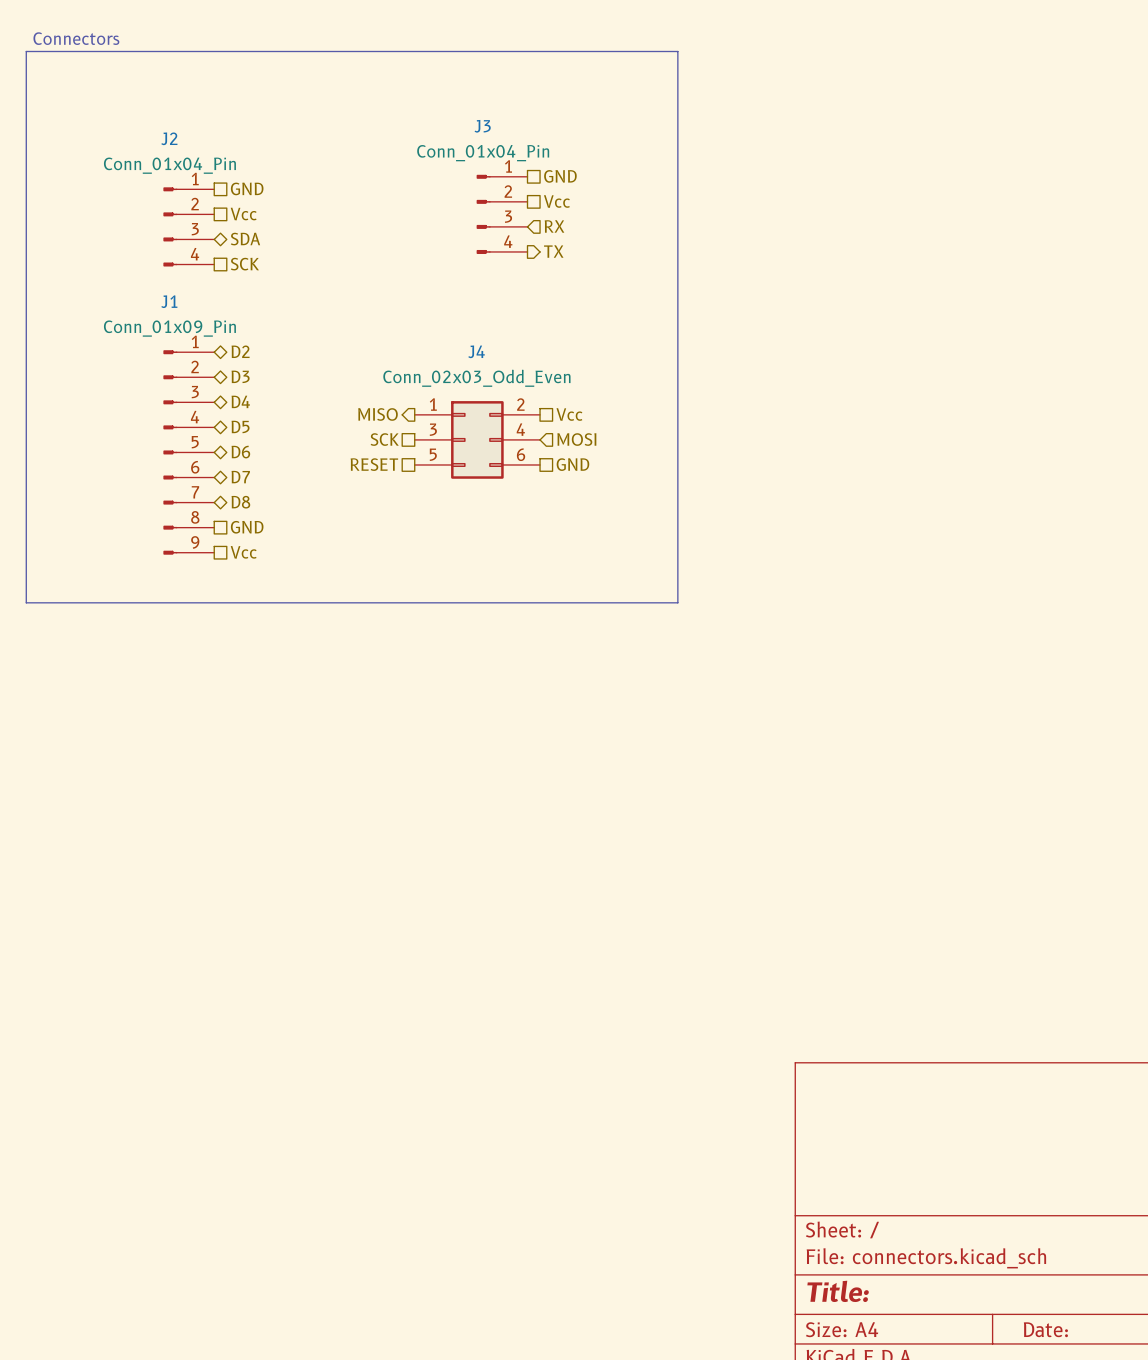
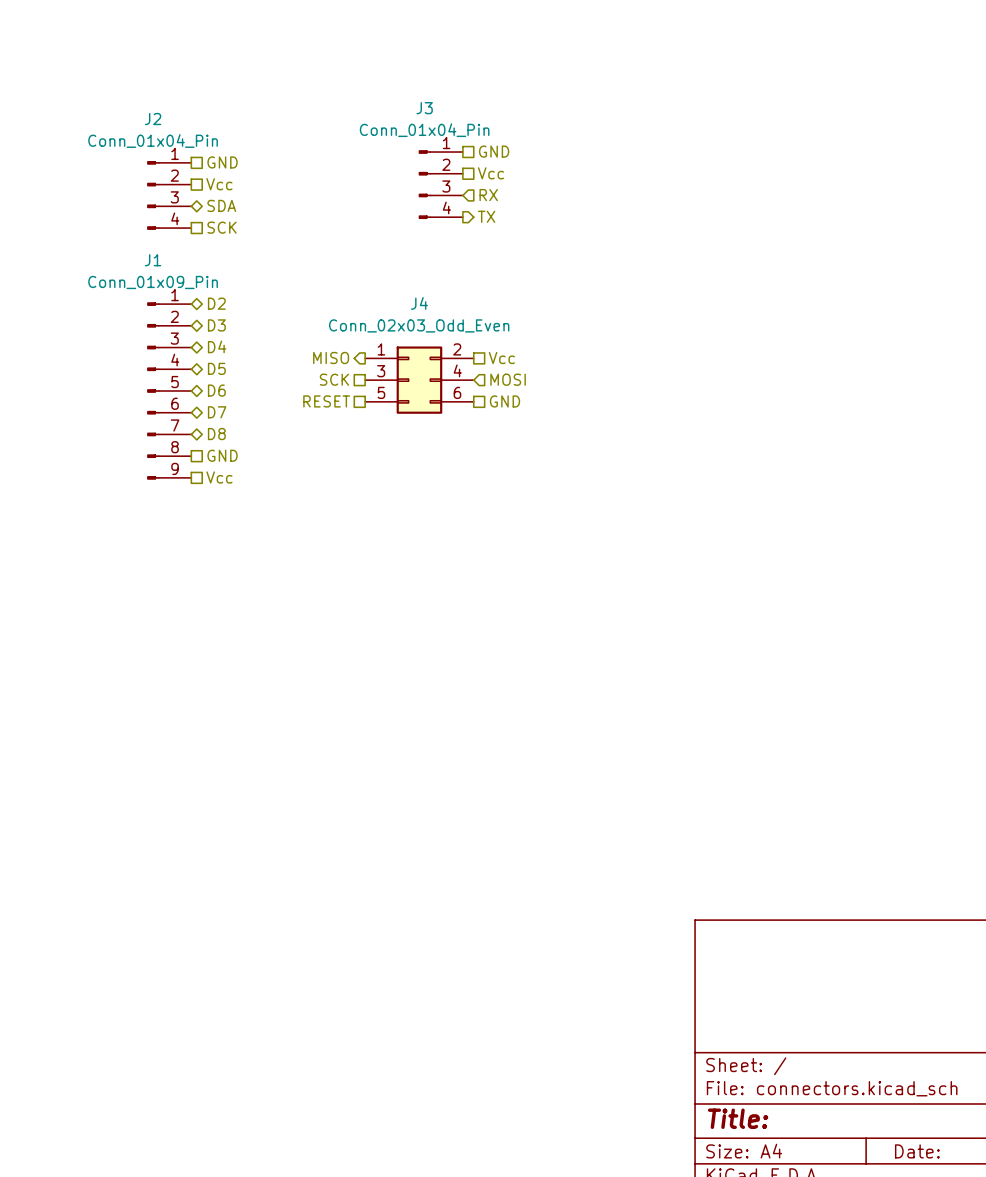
text: Connectors (76, 38) -> none
line: (26, 51) (677, 51) (677, 602) (26, 602) (26, 51) -> none

